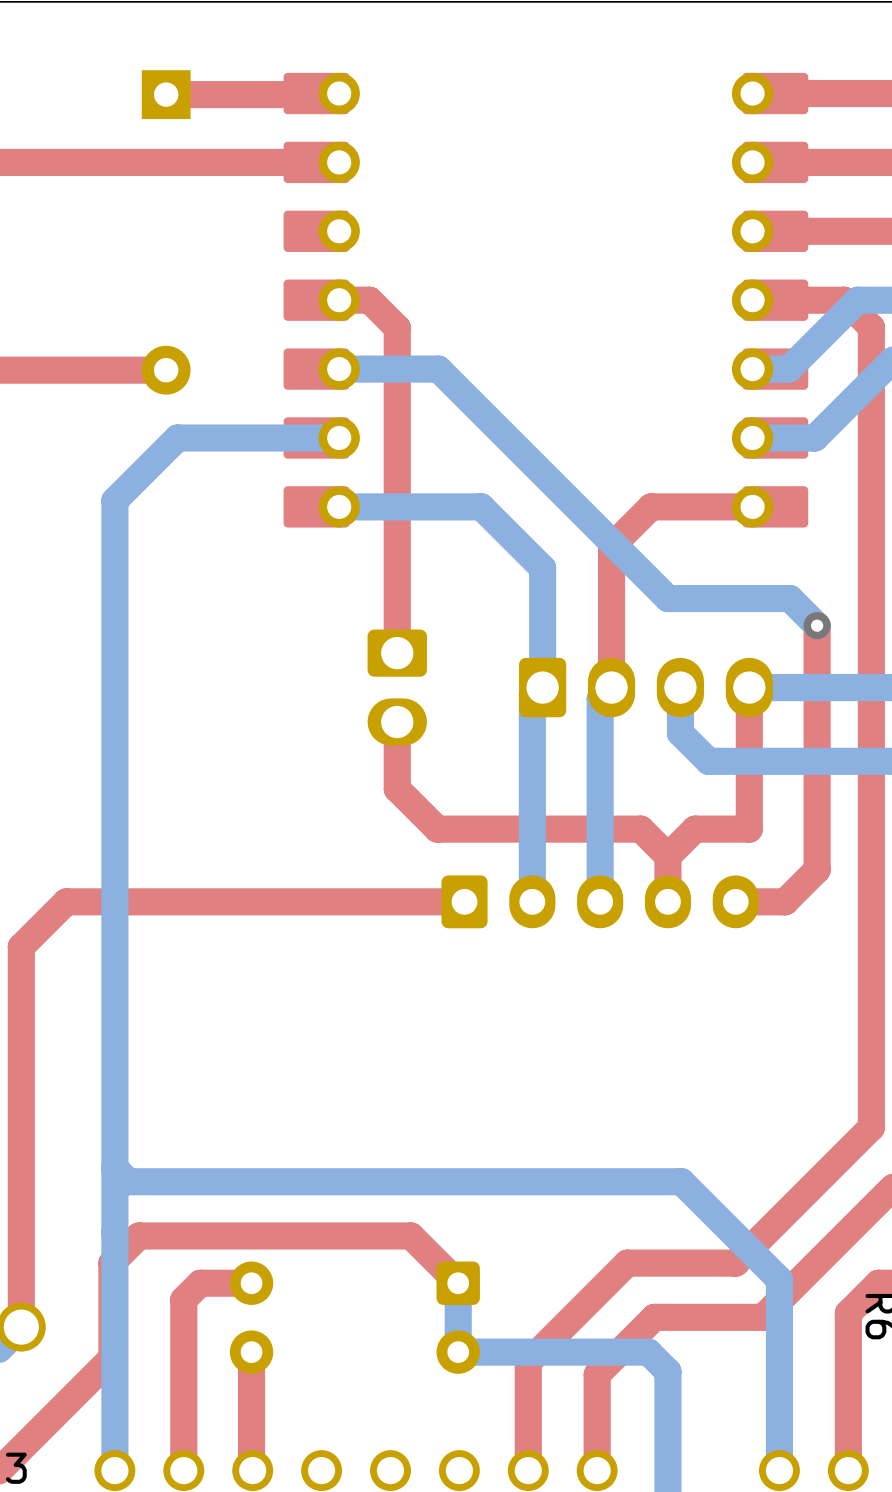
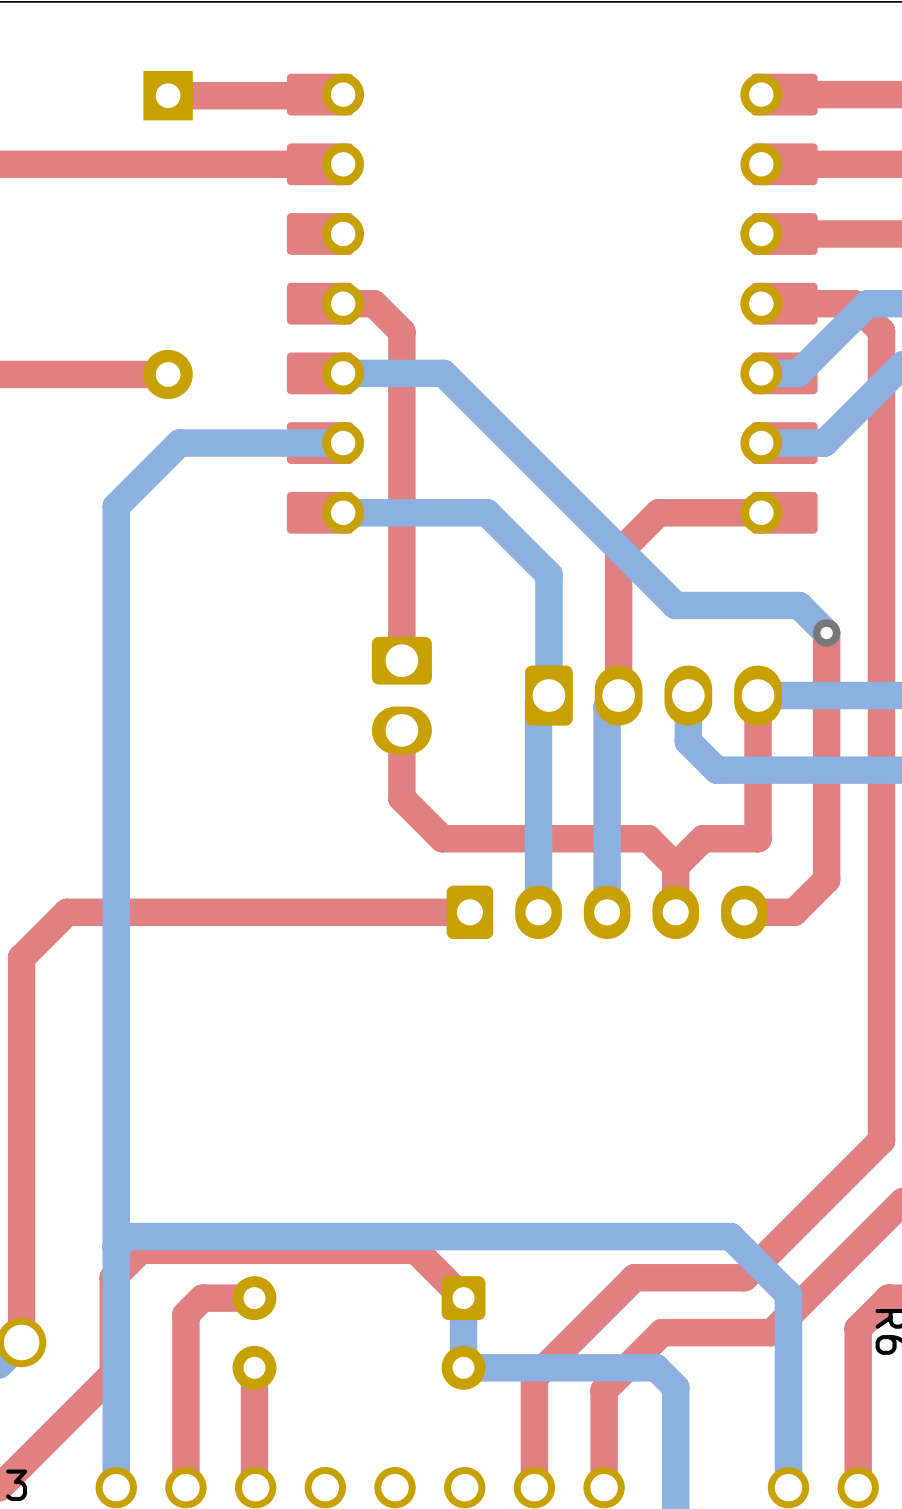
bottom track: (114, 1168) (128, 1181) (681, 1181) (722, 1222) -> (116, 1247) (126, 1236) (730, 1236)

